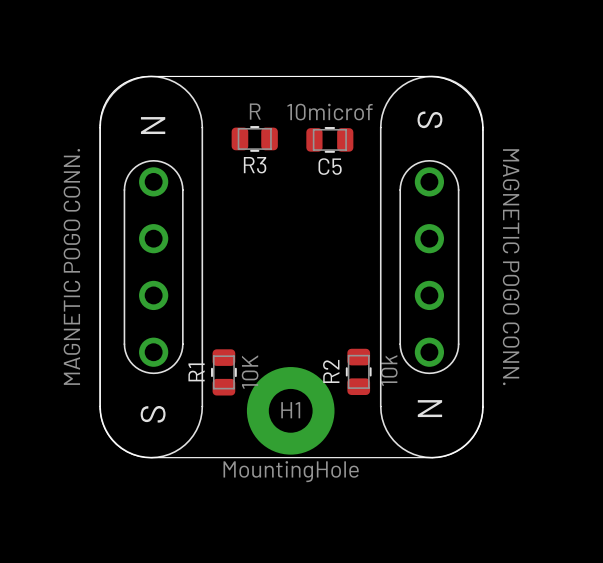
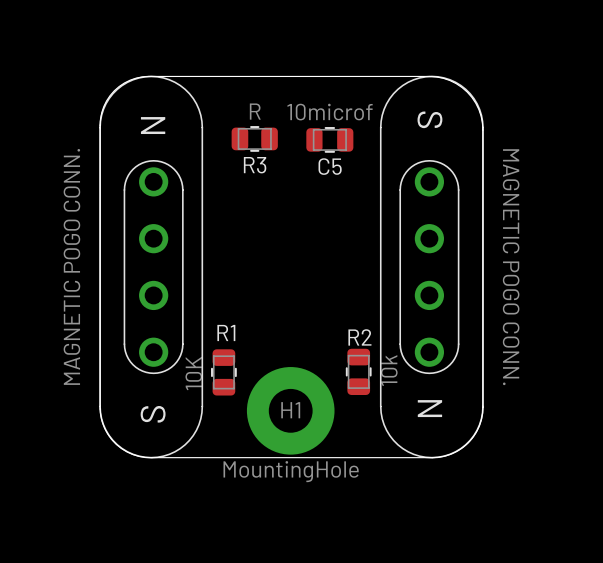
R2 name rotation: 0° (331, 371) -> 90° clockwise (359, 337)
R2 name position: R2 (331, 371) -> R2 (359, 337)
R1 name rotation: 0° (196, 372) -> 90° clockwise (226, 332)
R1 name position: R1 (196, 372) -> R1 (226, 332)
R1 value position: 10K (250, 372) -> 10K (193, 373)

